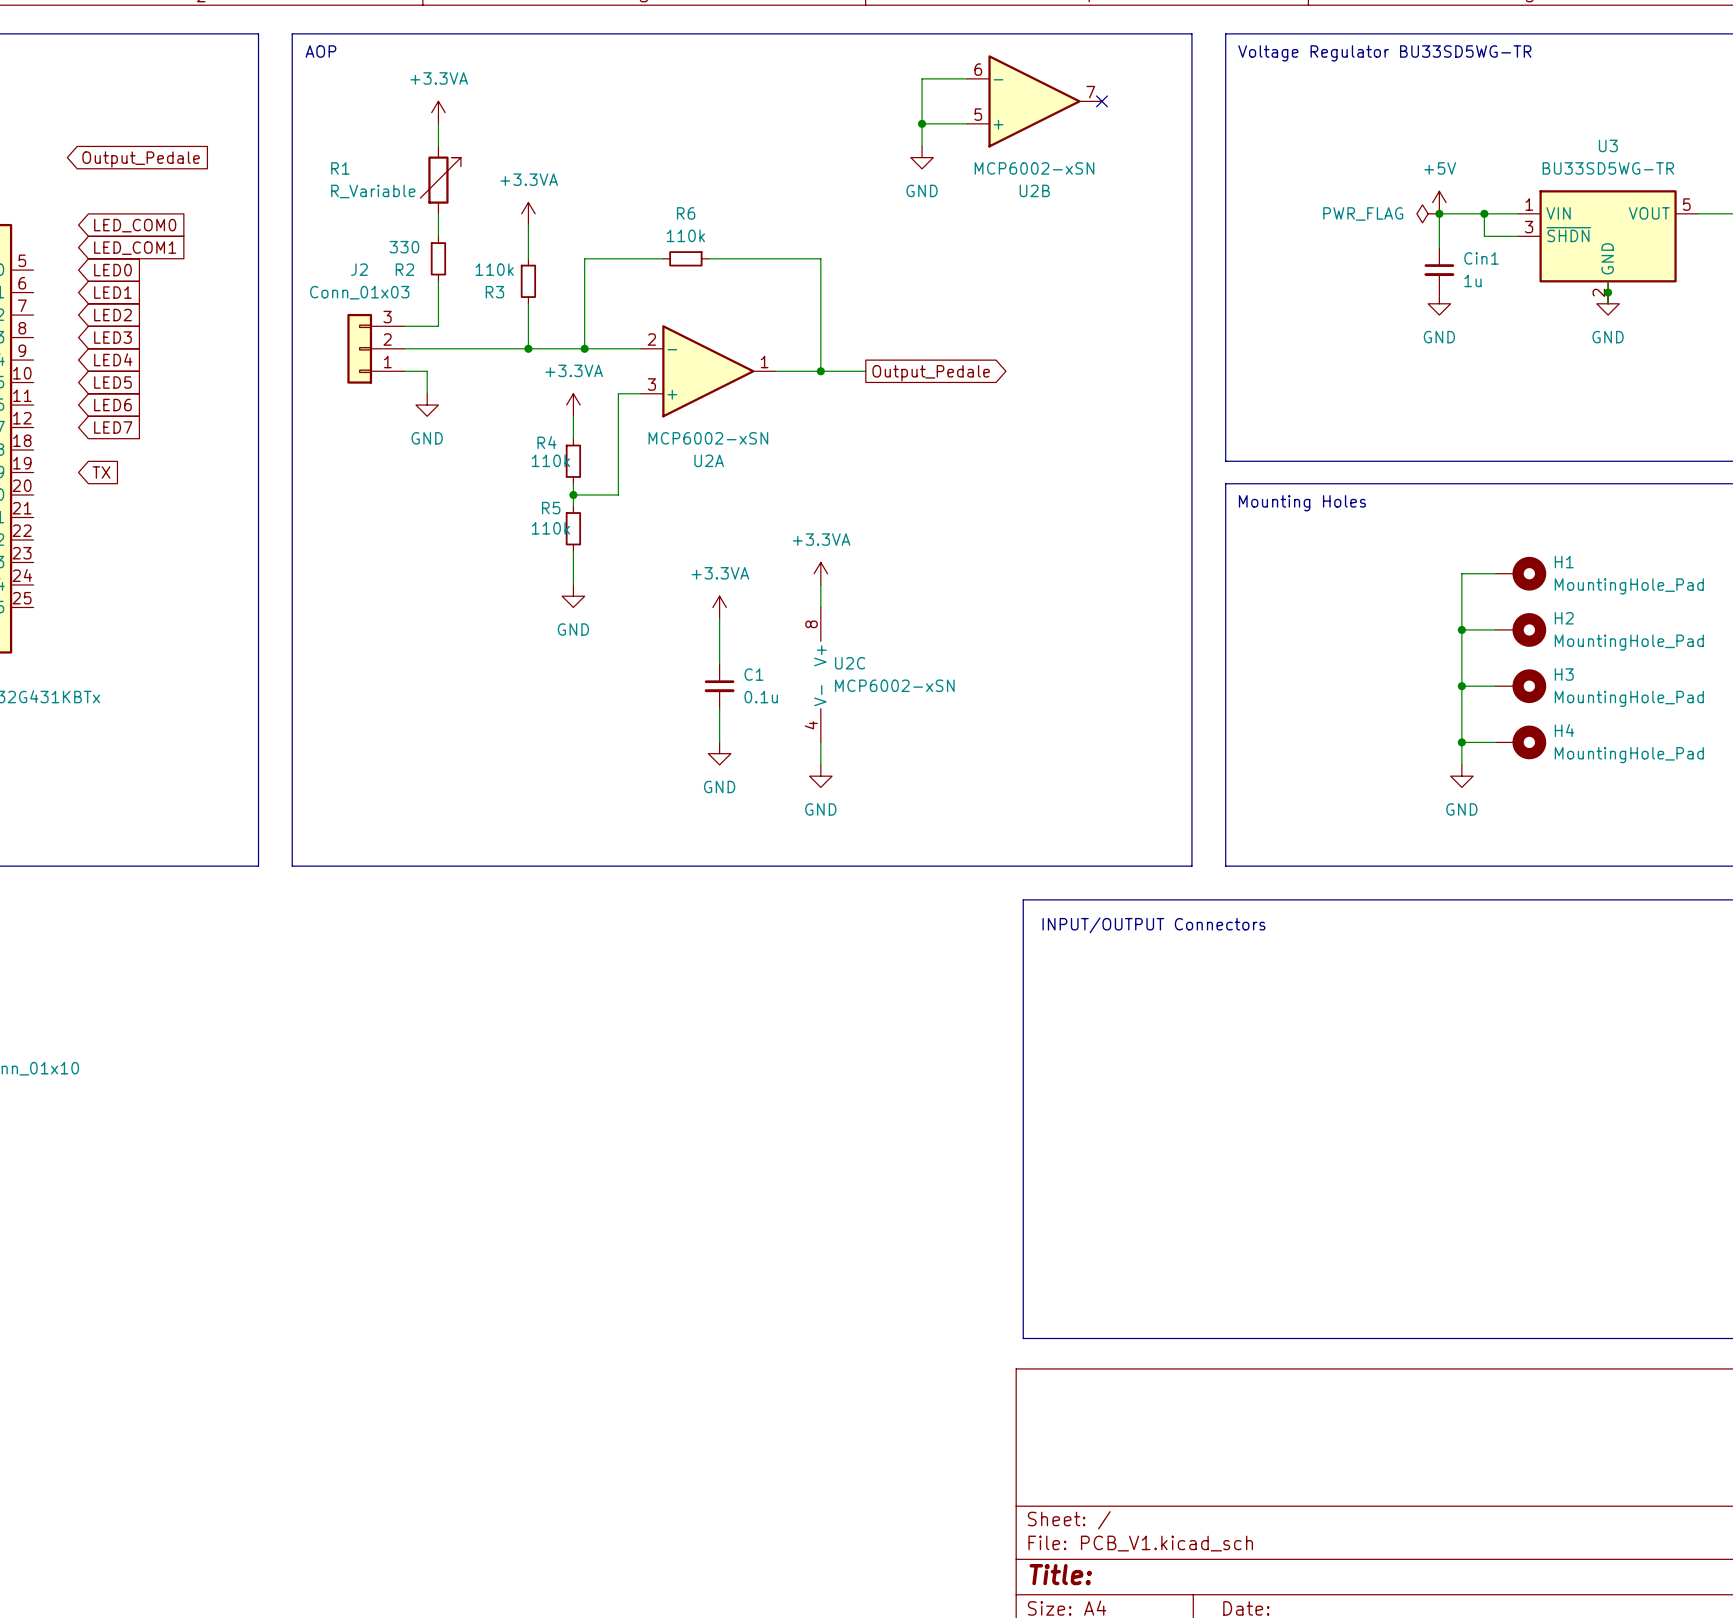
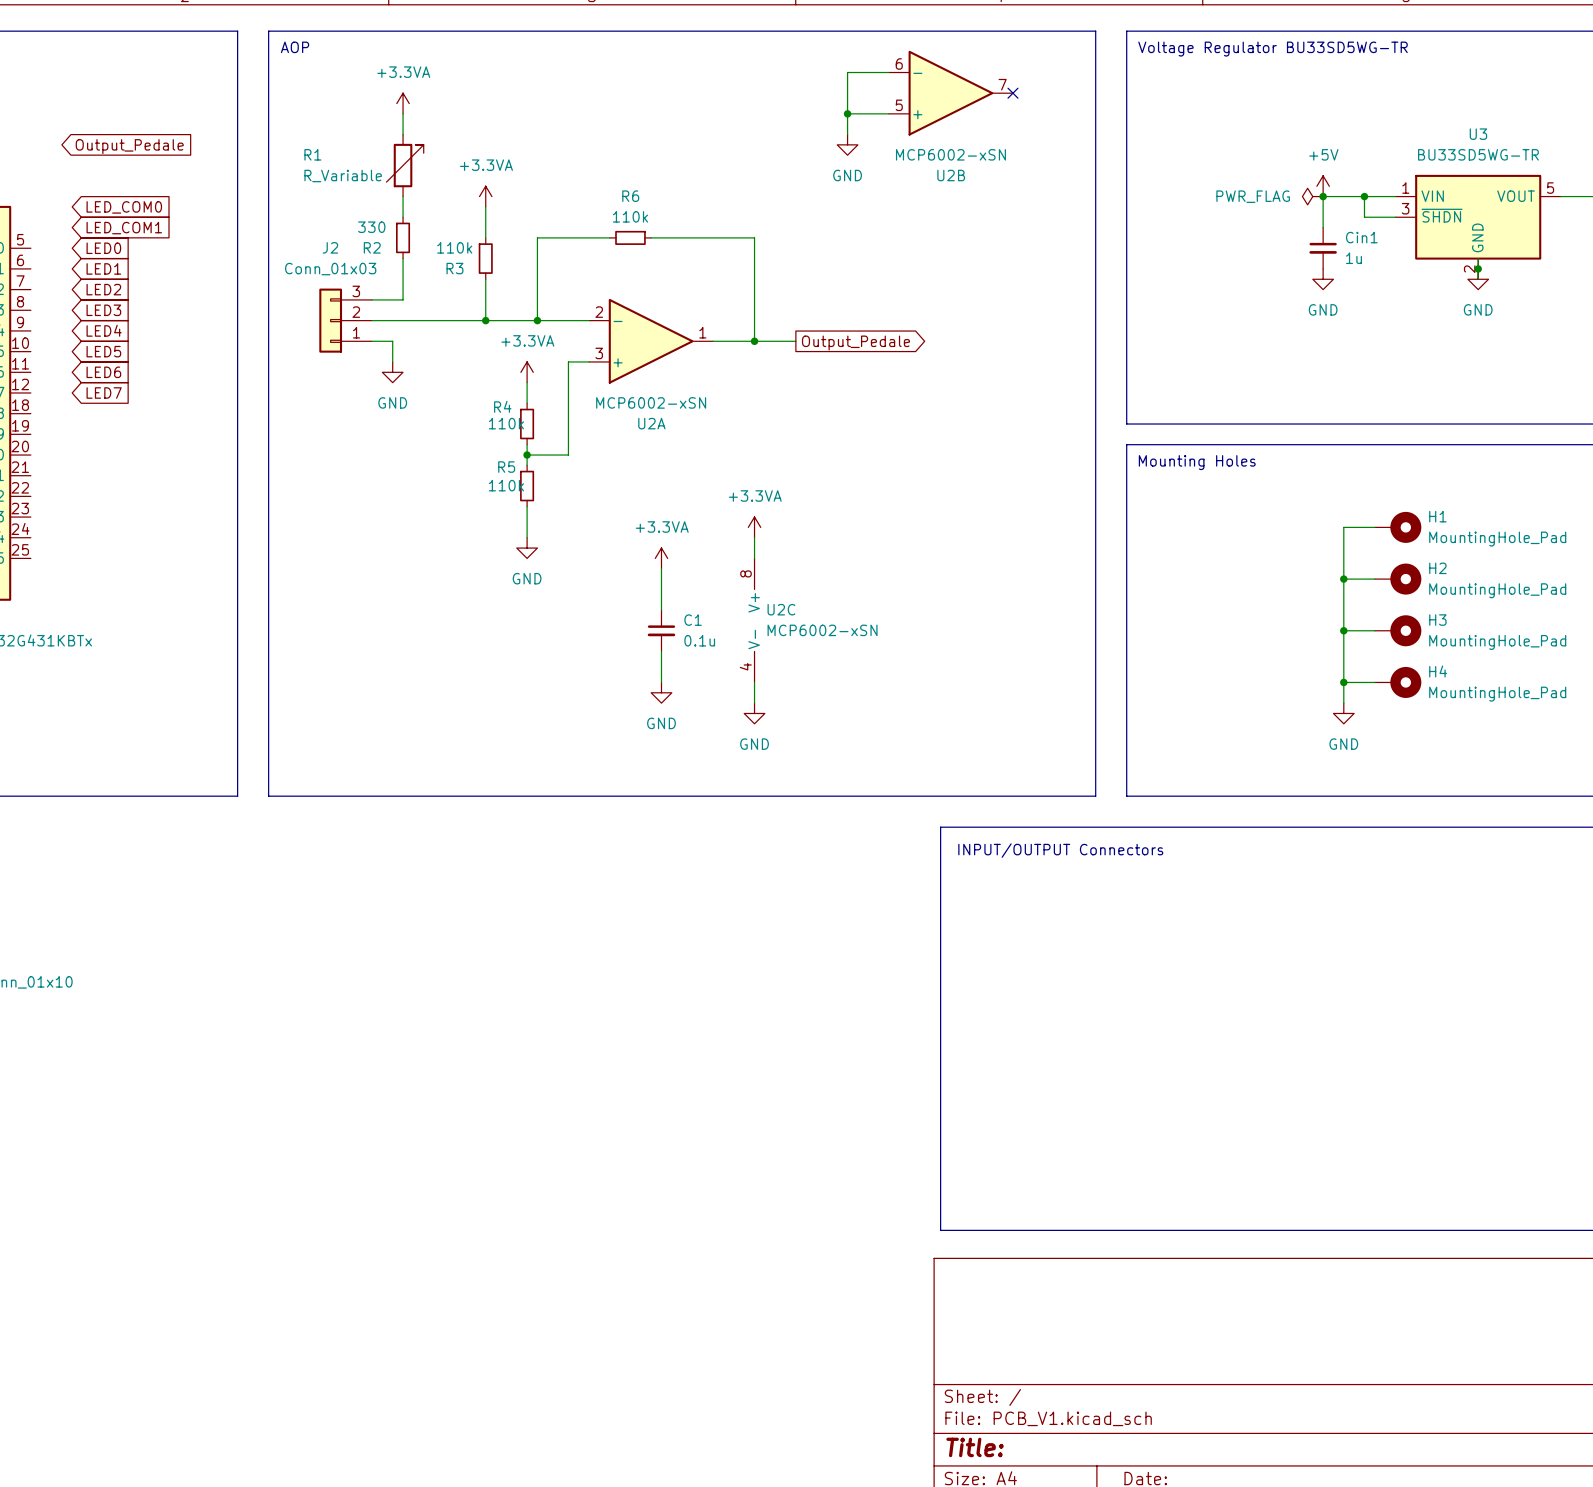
global label: TX (101, 472) -> none

